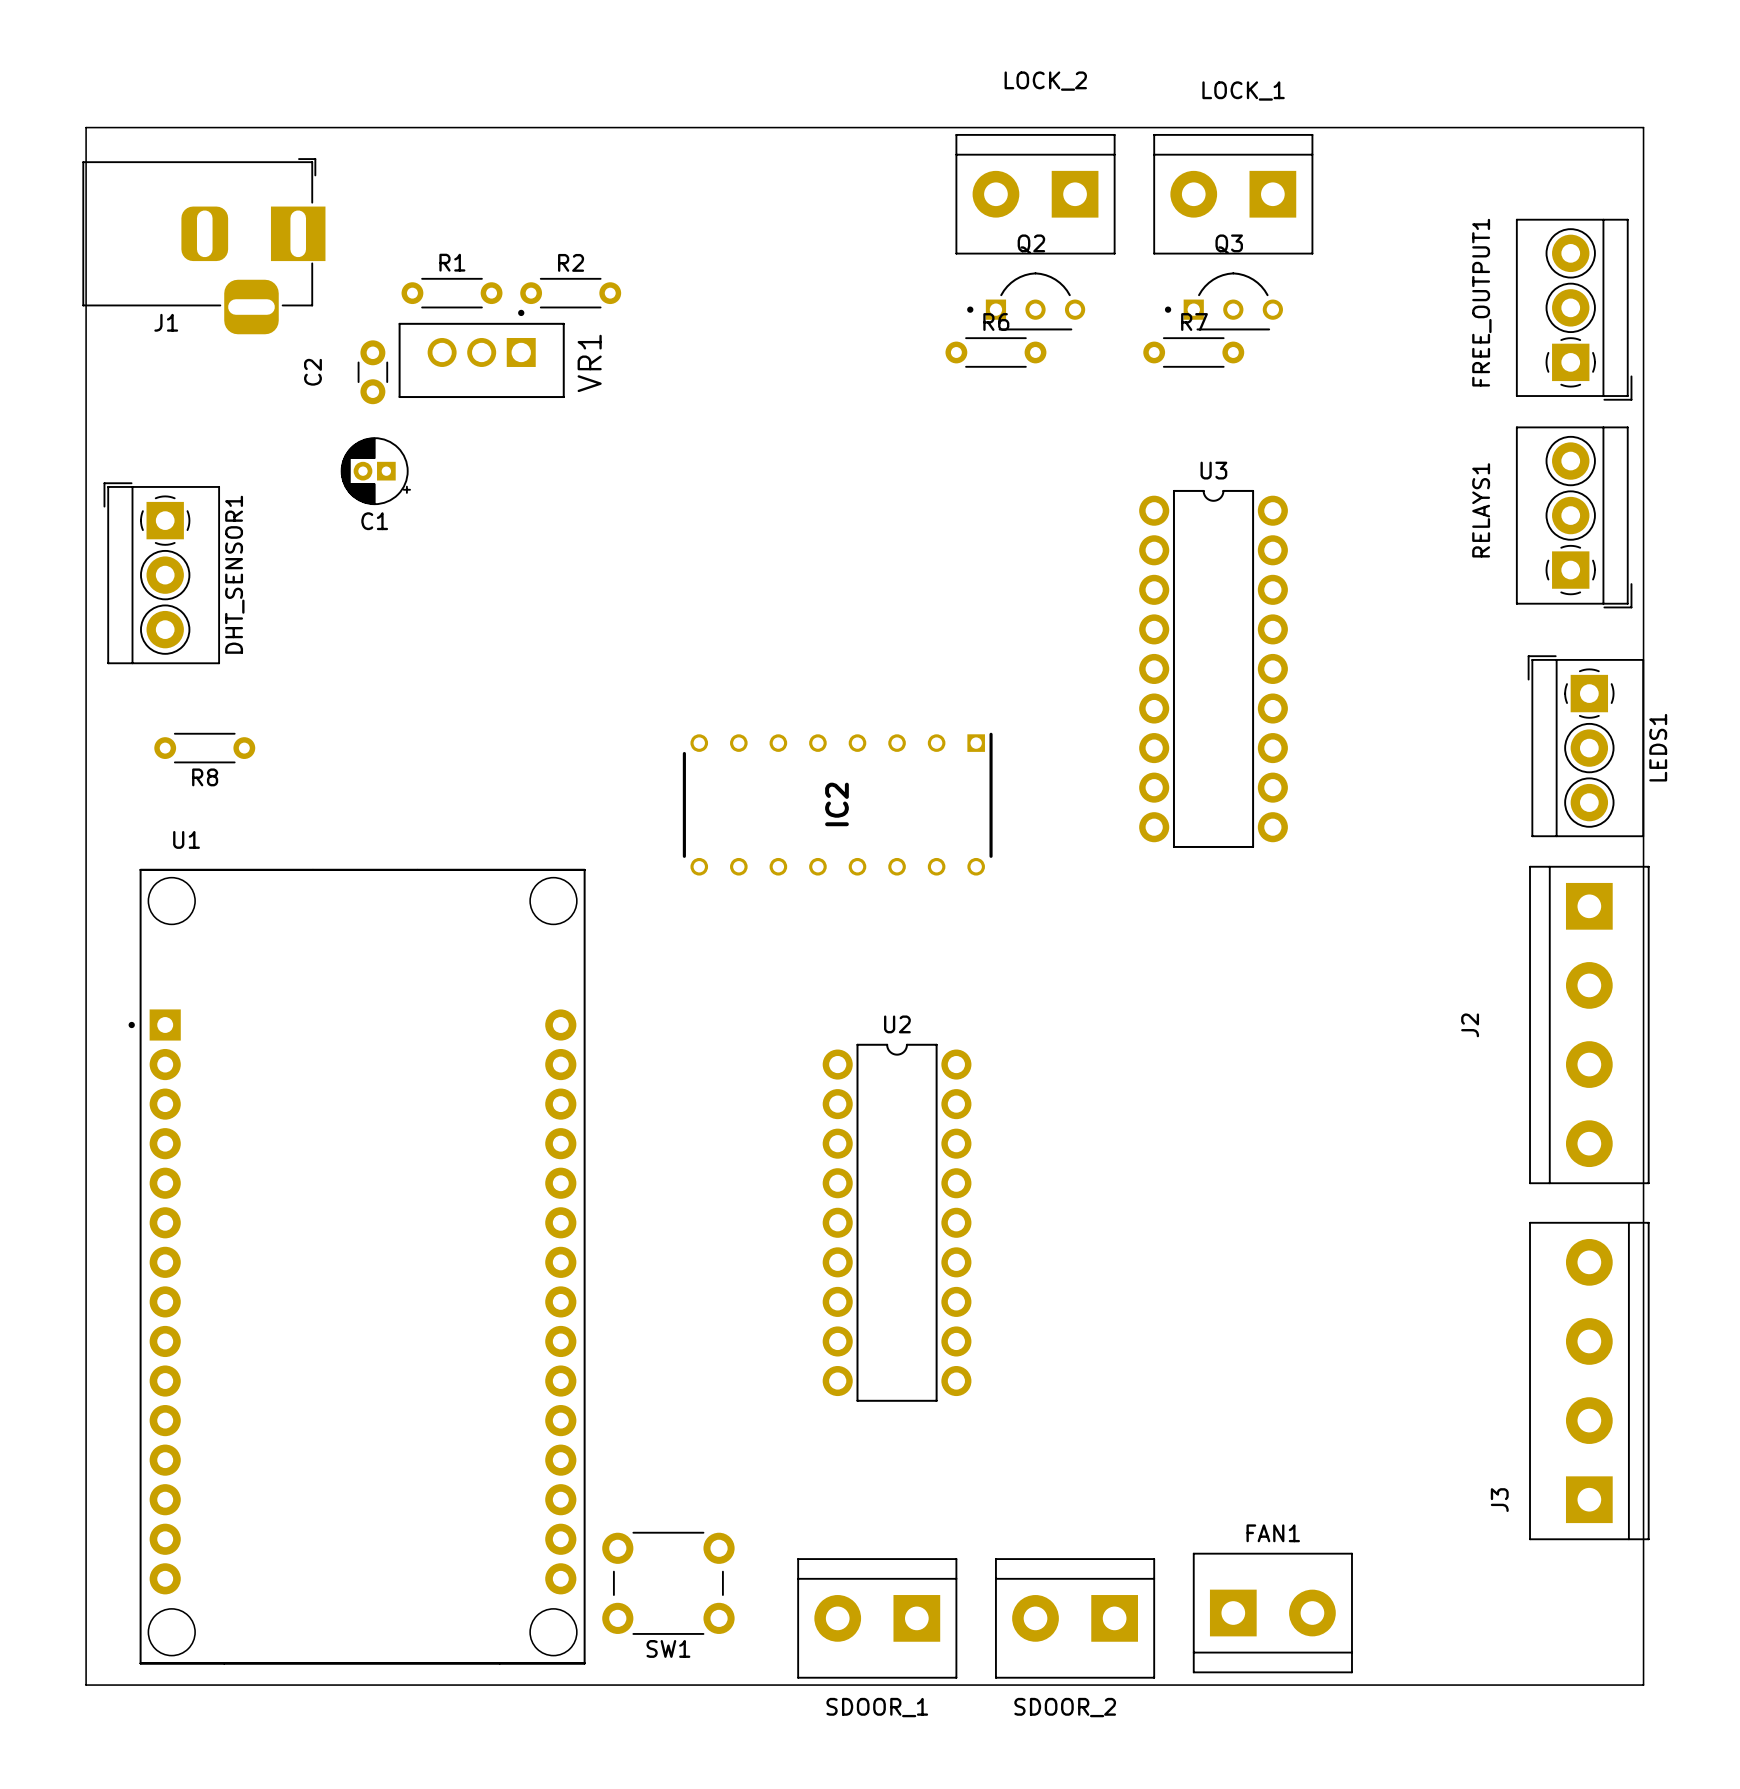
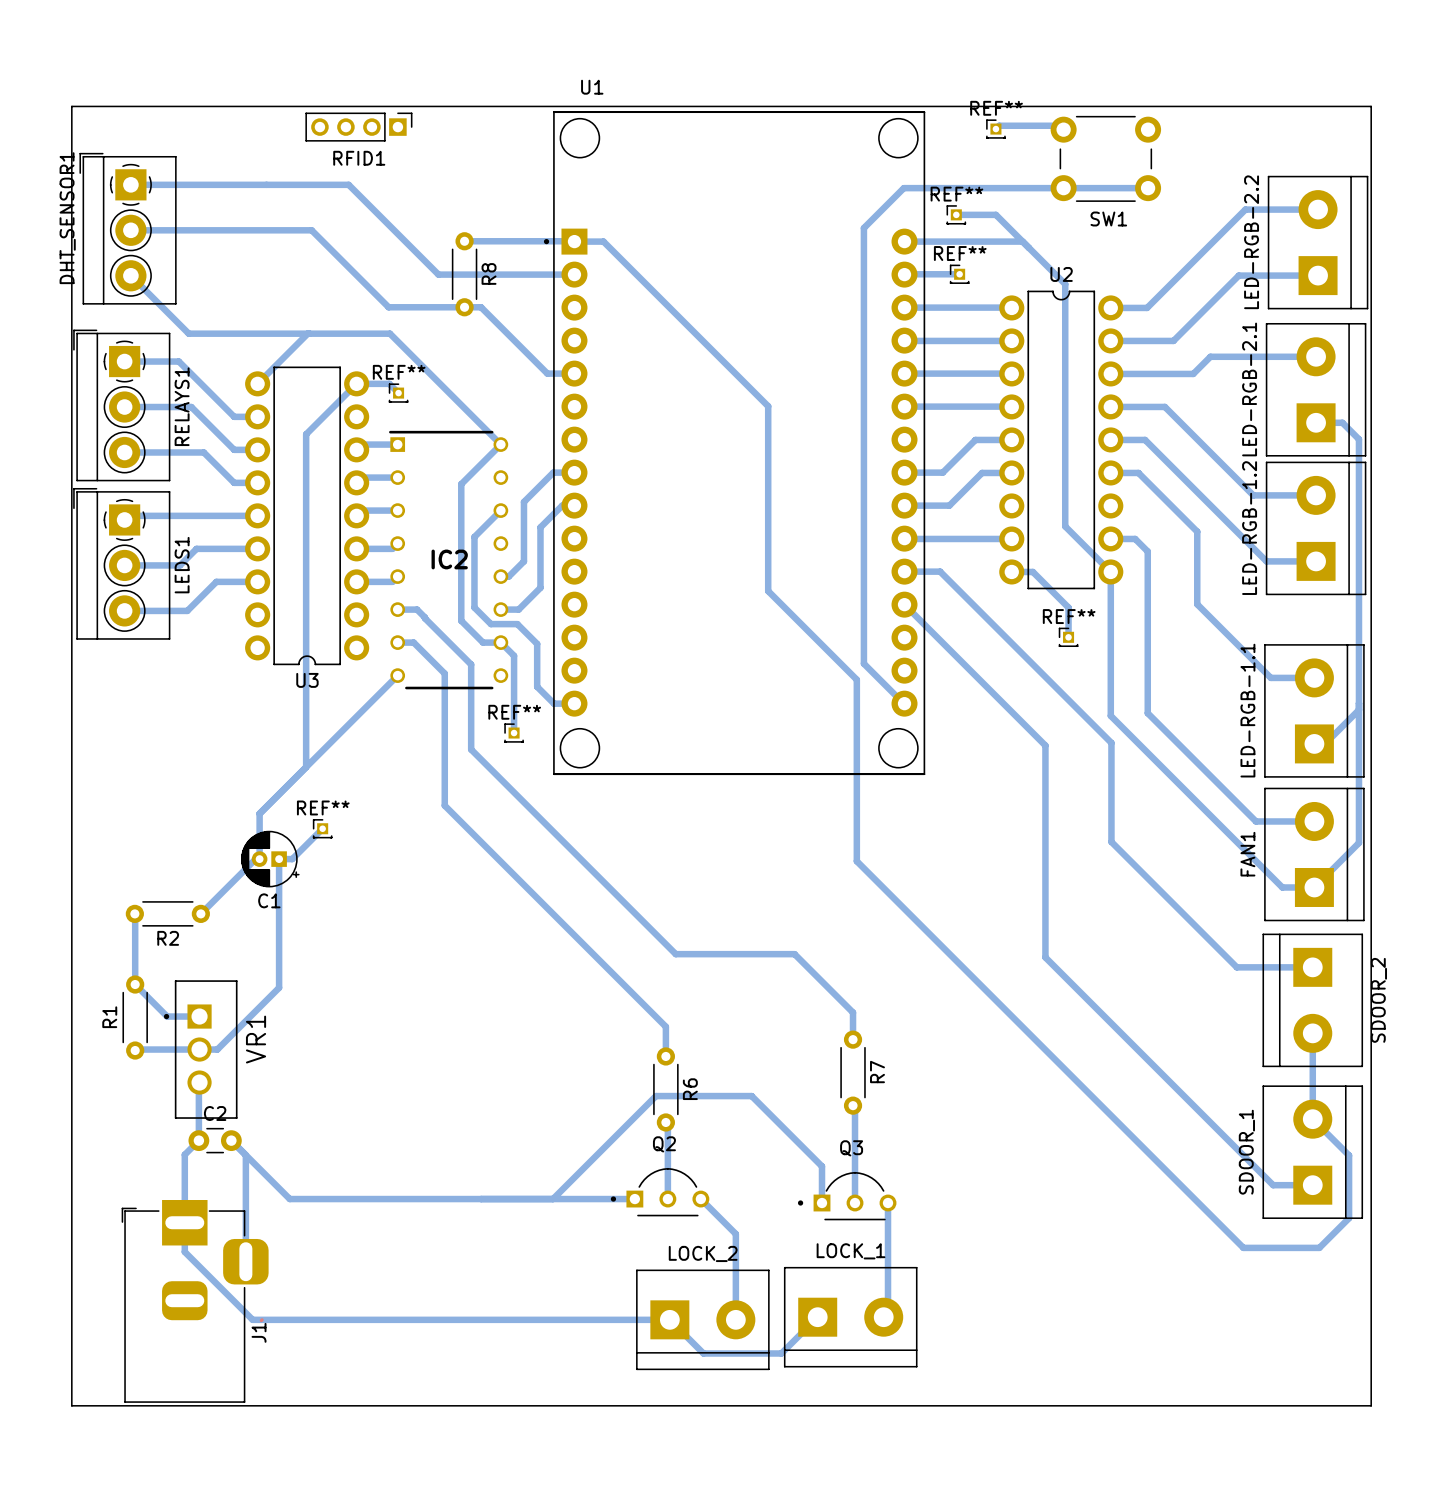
LOCK_2 name position: LOCK_2 (1045, 81) -> LOCK_2 (703, 1253)
RFID1: none -> (358, 127)
bottom track: none -> (995, 129) (999, 125) (1059, 125) (1063, 129)
REF**: none -> (995, 129)
LOCK_2 rotation: 0° (1035, 194) -> 180° (702, 1319)
LOCK_2 position: (1035, 194) -> (702, 1319)
LOCK_1 rotation: 0° (1233, 194) -> 180° (850, 1317)
LOCK_1 position: (1233, 194) -> (850, 1317)
bottom track: none -> (130, 184) (348, 184) (438, 274) (574, 274)
bottom track: none -> (1148, 188) (903, 188) (863, 228) (863, 663) (904, 703)
J1 rotation: 0° (203, 246) -> 90° counterclockwise (195, 1301)
J1 position: (203, 246) -> (195, 1301)
bottom track: none -> (1318, 209) (1245, 209) (1147, 307) (1110, 307)
bottom track: none -> (956, 214) (995, 214) (1065, 284) (1065, 526) (1110, 571) (1110, 715) (1282, 887) (1314, 887) (1358, 842) (1358, 439) (1342, 422) (1316, 422)
REF**: none -> (956, 214)
R1 name position: R1 (452, 262) -> R1 (109, 1017)
R2 name position: R2 (571, 262) -> R2 (168, 938)
bottom track: none -> (130, 230) (311, 230) (388, 307) (481, 307) (547, 373) (574, 373)
bottom track: none -> (464, 241) (603, 241) (768, 406) (768, 591) (856, 679) (856, 861) (1243, 1247) (1319, 1247) (1349, 1218) (1349, 1155) (1312, 1119) (1312, 1033)
bottom track: none -> (904, 241) (1022, 241)
LED-RGB-2.2: none -> (1318, 242)
R1 rotation: 0° (452, 293) -> 90° clockwise (135, 1017)
R1 position: (452, 293) -> (135, 1017)
R2 position: (570, 293) -> (167, 913)
Q2 position: (1026, 301) -> (660, 1192)
Q3 position: (1223, 301) -> (847, 1196)
FREE_OUTPUT1: (1574, 309) -> none
bottom track: none -> (959, 274) (904, 274)
REF**: none -> (959, 274)
bottom track: none -> (130, 275) (188, 333) (389, 333) (500, 444) (461, 484) (461, 620) (483, 642) (500, 642) (514, 655) (514, 733)
bottom track: none -> (1318, 275) (1238, 275) (1173, 340) (1110, 340)
R6 rotation: 0° (995, 352) -> 90° clockwise (665, 1089)
R6 position: (995, 352) -> (665, 1089)
R7 rotation: 0° (1193, 352) -> 90° clockwise (853, 1072)
R7 position: (1193, 352) -> (853, 1072)
VR1 rotation: 0° (481, 353) -> 90° counterclockwise (200, 1049)
VR1 position: (481, 353) -> (200, 1049)
VR1 name position: VR1 (589, 363) -> VR1 (256, 1039)
bottom track: none -> (904, 307) (1011, 307)
C2 rotation: 0° (372, 372) -> 90° clockwise (215, 1140)
C2 position: (372, 372) -> (215, 1140)
bottom track: none -> (307, 333) (257, 383)
bottom track: none -> (904, 340) (1011, 340)
bottom track: none -> (1316, 356) (1210, 356) (1193, 373) (1110, 373)
bottom track: none -> (124, 361) (178, 361) (234, 416) (257, 416)
bottom track: none -> (904, 373) (1011, 373)
LED-RGB-2.1: none -> (1316, 389)
C1 position: (375, 471) -> (270, 859)
bottom track: none -> (398, 393) (389, 383) (356, 383) (306, 434) (306, 767)
REF**: none -> (398, 393)
bottom track: none -> (124, 407) (191, 407) (234, 449) (257, 449)
bottom track: none -> (904, 406) (1011, 406)
bottom track: none -> (1110, 406) (1164, 406) (1253, 495) (1316, 495)
RELAYS1 rotation: 0° (1574, 517) -> 180° (121, 405)
RELAYS1 position: (1574, 517) -> (121, 405)
bottom track: none -> (1011, 439) (975, 439) (942, 472) (904, 472)
bottom track: none -> (1110, 439) (1145, 439) (1266, 561) (1316, 561)
bottom track: none -> (397, 444) (361, 444) (356, 449)
bottom track: none -> (124, 452) (203, 452) (234, 482) (257, 482)
bottom track: none -> (574, 472) (553, 472) (523, 502) (523, 561) (508, 576) (500, 576)
bottom track: none -> (1011, 472) (982, 472) (949, 505) (904, 505)
bottom track: none -> (1110, 472) (1138, 472) (1197, 531) (1197, 604) (1270, 677) (1314, 677)
bottom track: none -> (397, 477) (361, 477) (356, 482)
DHT_SENSOR1 position: (161, 573) -> (128, 228)
DHT_SENSOR1 name position: DHT_SENSOR1 (234, 574) -> DHT_SENSOR1 (67, 218)
bottom track: none -> (574, 505) (562, 505) (540, 527) (540, 587) (518, 609) (500, 609)
bottom track: none -> (397, 510) (361, 510) (356, 515)
bottom track: none -> (500, 510) (474, 536) (474, 607) (490, 624) (517, 624) (537, 643) (537, 686) (554, 703) (574, 703)
bottom track: none -> (257, 515) (128, 515) (124, 519)
LED-RGB-1.2: none -> (1316, 528)
bottom track: none -> (904, 538) (1011, 538)
bottom track: none -> (1110, 538) (1135, 538) (1147, 551) (1147, 713) (1256, 821) (1314, 821)
bottom track: none -> (397, 543) (392, 548) (356, 548)
bottom track: none -> (257, 548) (196, 548) (180, 565) (124, 565)
U3 rotation: 0° (1213, 668) -> 180° (307, 515)
U3 position: (1213, 668) -> (307, 515)
bottom track: none -> (904, 571) (940, 571) (1111, 742) (1111, 841) (1236, 967) (1312, 967)
bottom track: none -> (1011, 571) (1032, 571) (1068, 607) (1068, 637)
bottom track: none -> (397, 576) (392, 581) (356, 581)
bottom track: none -> (257, 581) (216, 581) (187, 610) (124, 610)
bottom track: none -> (904, 604) (1045, 745) (1045, 957) (1273, 1185) (1312, 1185)
bottom track: none -> (397, 609) (417, 609) (471, 664) (471, 749) (675, 954) (794, 954) (853, 1012) (853, 1039)
LEDS1 position: (1585, 746) -> (121, 563)
R8 rotation: 0° (204, 748) -> 90° clockwise (464, 274)
R8 position: (204, 748) -> (464, 274)
REF**: none -> (1068, 637)
bottom track: none -> (397, 642) (413, 642) (444, 673) (444, 805) (665, 1026) (665, 1056)
R8 name position: R8 (205, 777) -> R8 (489, 273)
IC2 rotation: 0° (837, 804) -> 90° counterclockwise (448, 560)
IC2 position: (837, 804) -> (448, 560)
bottom track: none -> (397, 675) (259, 813) (259, 859) (255, 859) (200, 913)
bottom track: none -> (1358, 709) (1324, 743) (1314, 743)
LED-RGB-1.1: none -> (1314, 710)
REF**: none -> (514, 733)
bottom track: none -> (322, 828) (292, 859) (279, 859) (279, 987) (217, 1049) (135, 1050)
REF**: none -> (322, 828)
J2: (1589, 1024) -> none
bottom track: none -> (134, 913) (135, 984)
bottom track: none -> (134, 984) (167, 1016) (199, 1016)
U2 position: (897, 1222) -> (1061, 439)
U1 position: (357, 1266) -> (734, 443)
bottom track: none -> (199, 1082) (198, 1140) (184, 1154) (184, 1251) (252, 1319) (669, 1319)
bottom track: none -> (853, 1105) (855, 1107) (855, 1203)
bottom track: none -> (665, 1122) (667, 1124) (667, 1199)
bottom track: none -> (231, 1140) (289, 1199) (634, 1199)
J3: (1589, 1381) -> none
bottom track: none -> (245, 1155) (245, 1261)
bottom track: none -> (553, 1199) (655, 1096) (751, 1096) (822, 1166) (822, 1203)
bottom track: none -> (700, 1199) (735, 1234) (735, 1319)
bottom track: none -> (888, 1203) (888, 1312) (883, 1317)
bottom track: none -> (817, 1317) (781, 1353) (703, 1353) (669, 1319)
top track: none -> (262, 1319) (261, 1320)
SW1 position: (668, 1583) -> (1105, 158)
FAN1 rotation: 0° (1272, 1613) -> 90° counterclockwise (1314, 854)
FAN1 position: (1272, 1613) -> (1314, 854)
SDOOR_1 rotation: 0° (877, 1618) -> 90° clockwise (1312, 1152)
SDOOR_1 position: (877, 1618) -> (1312, 1152)
SDOOR_2 rotation: 0° (1075, 1618) -> 90° counterclockwise (1312, 1000)
SDOOR_2 position: (1075, 1618) -> (1312, 1000)
SW1 name position: SW1 (668, 1648) -> SW1 (1108, 219)

